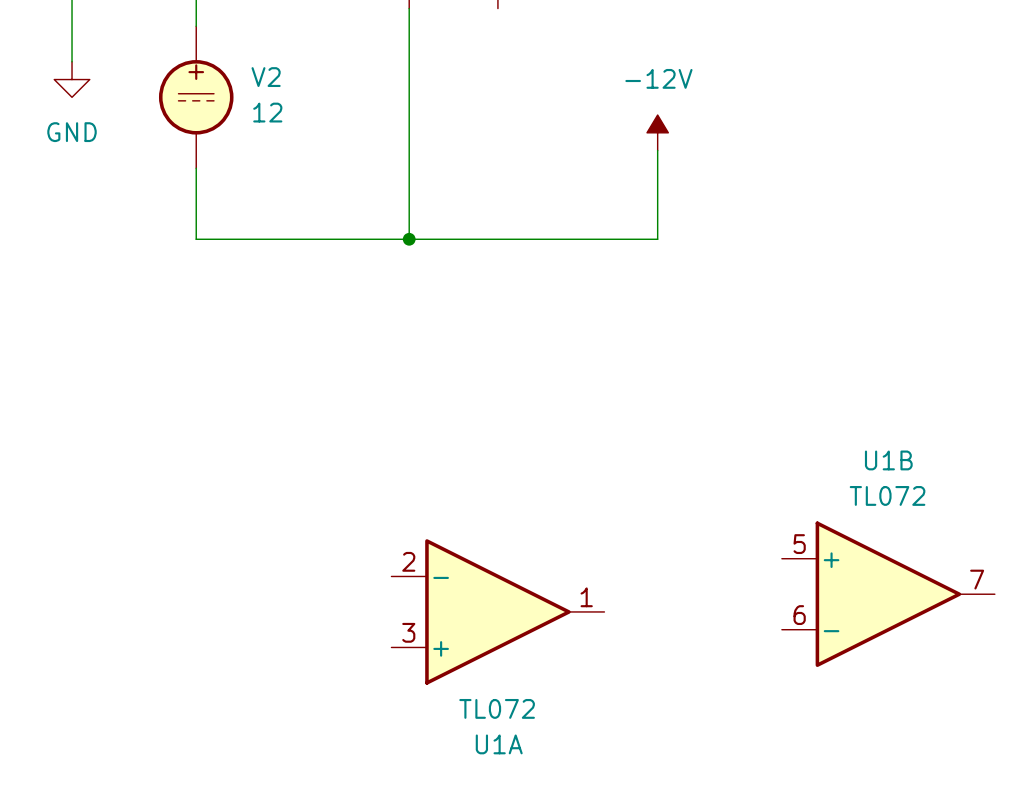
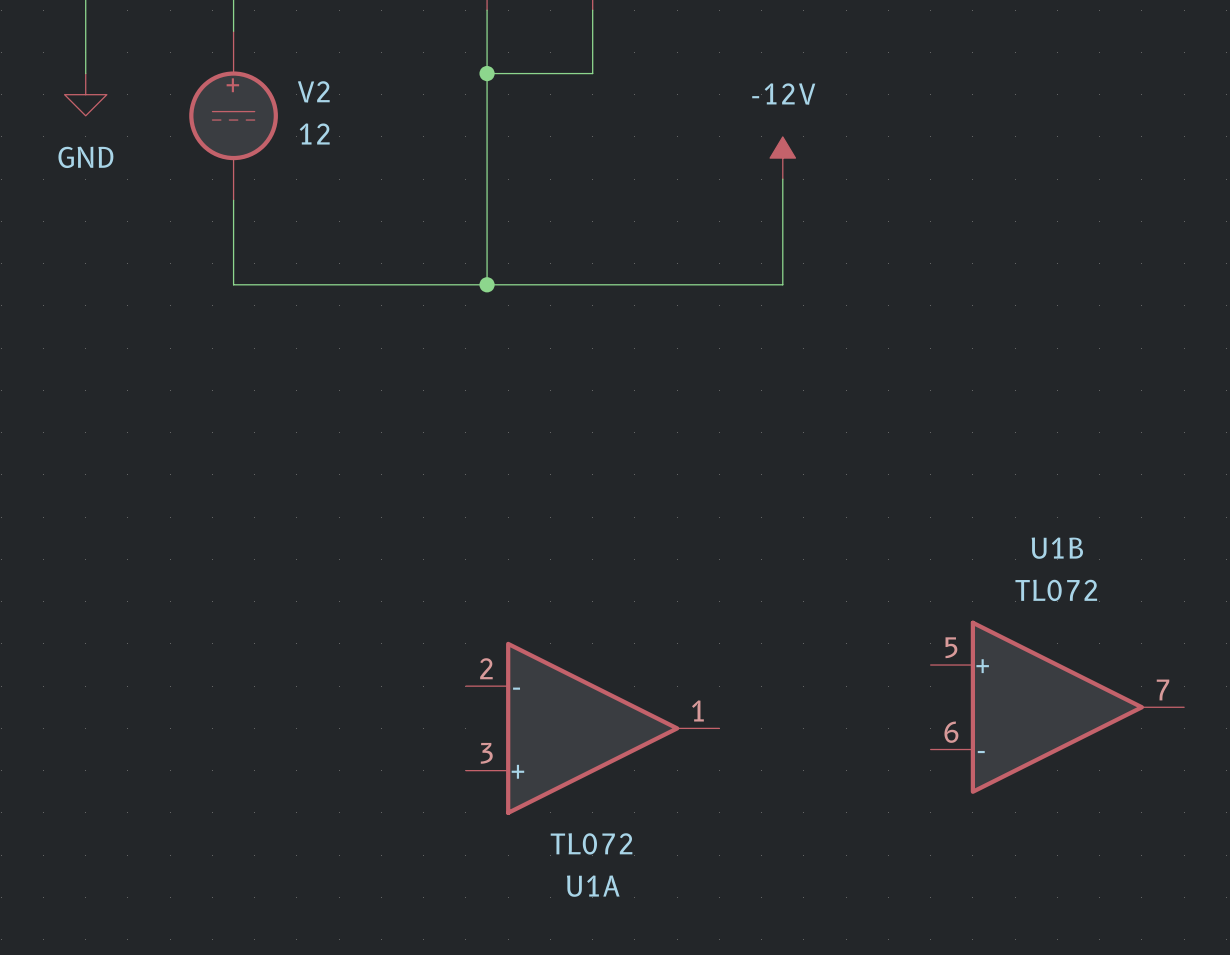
wire: none -> (592, 10) (592, 73) (487, 73)
junction: none -> (487, 73)

